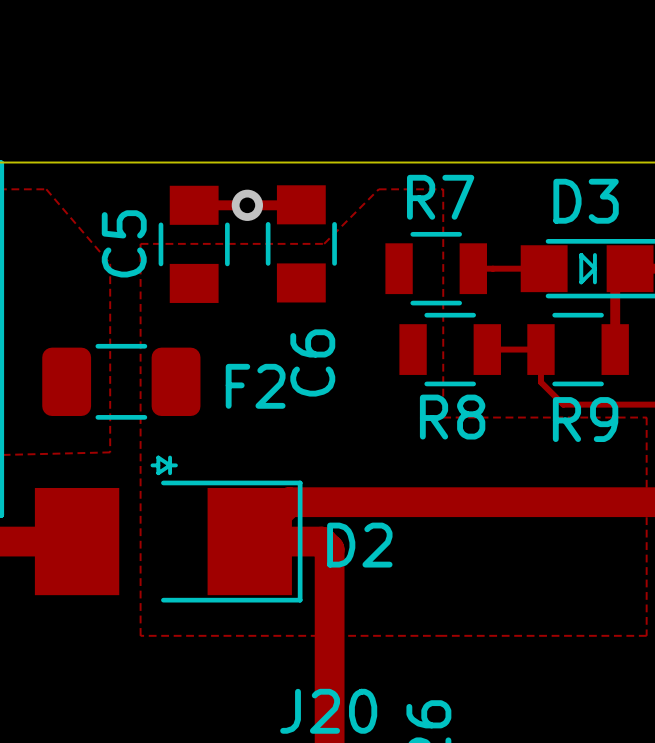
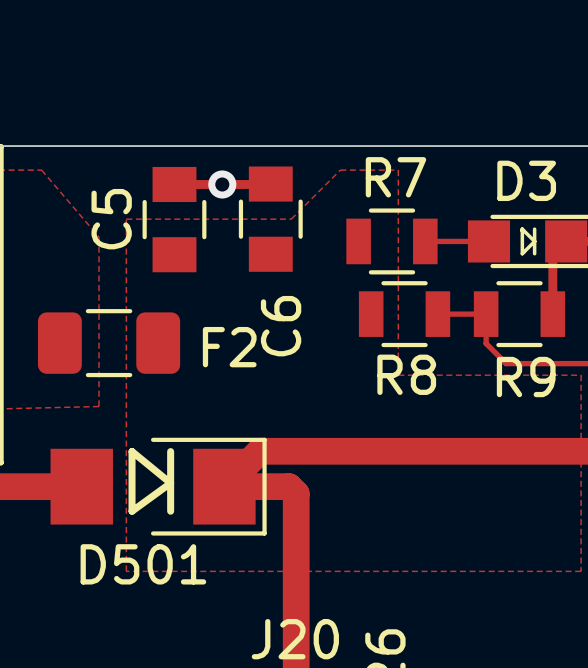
D2: (168, 529) -> none
D501: none -> (158, 486)

